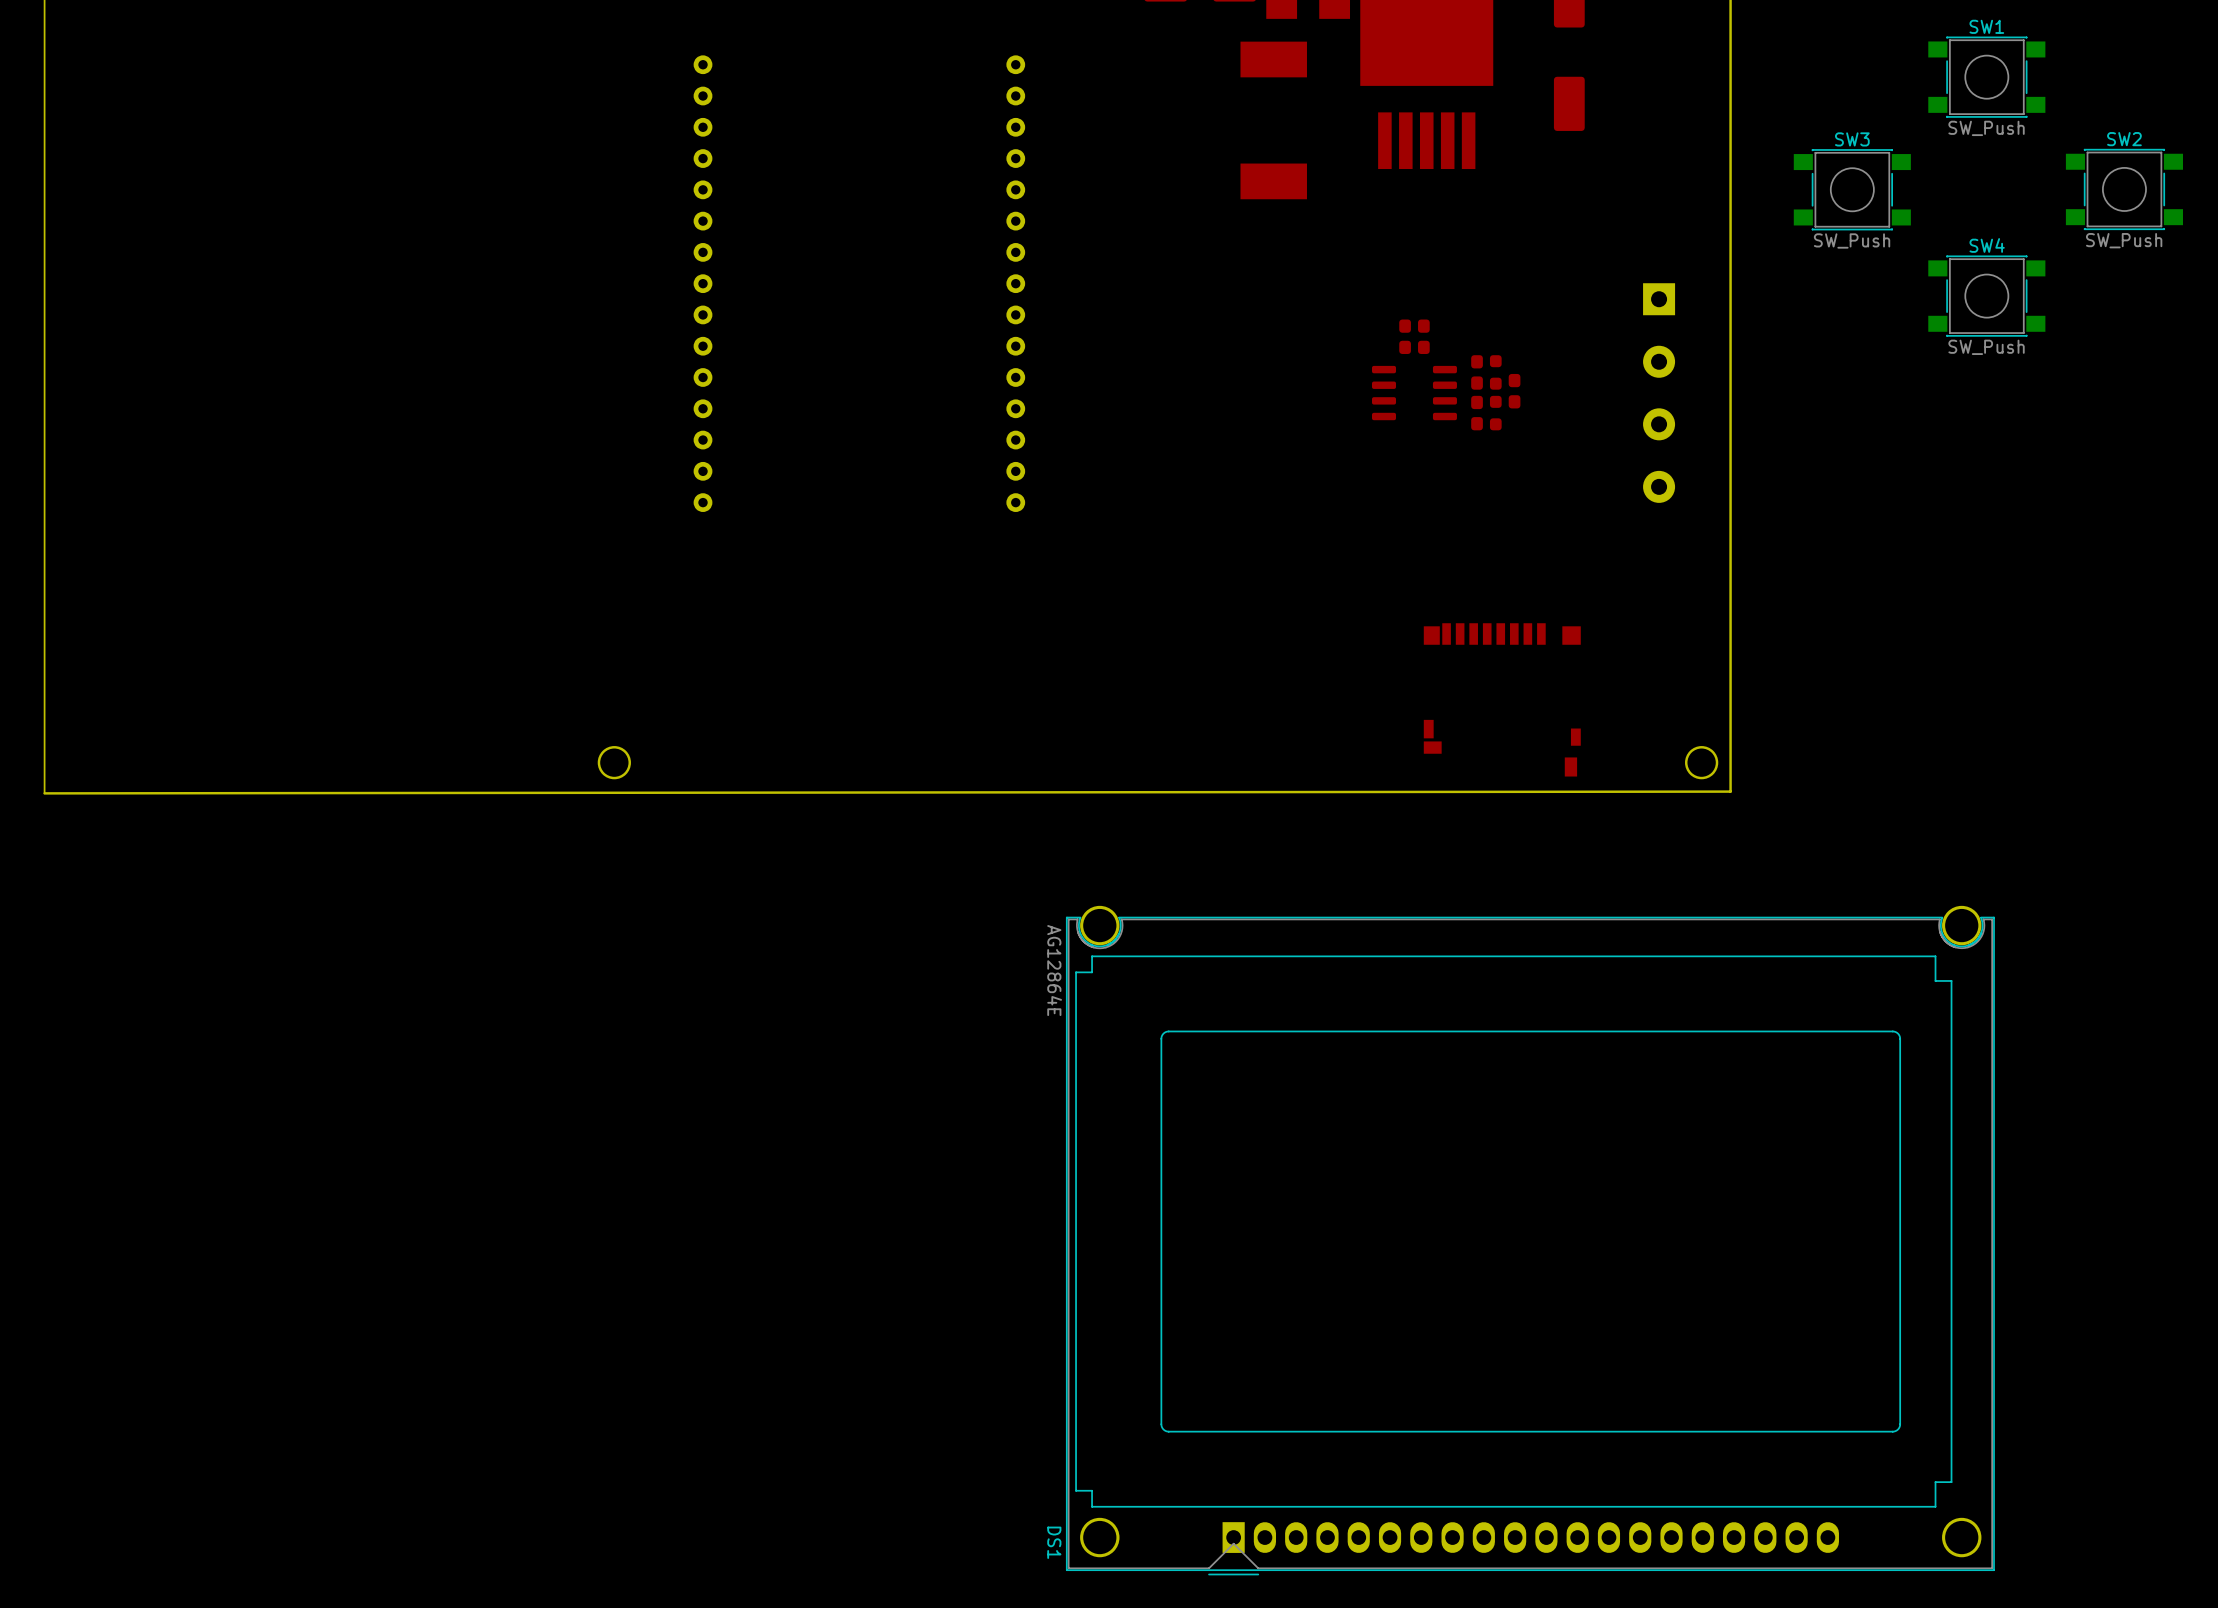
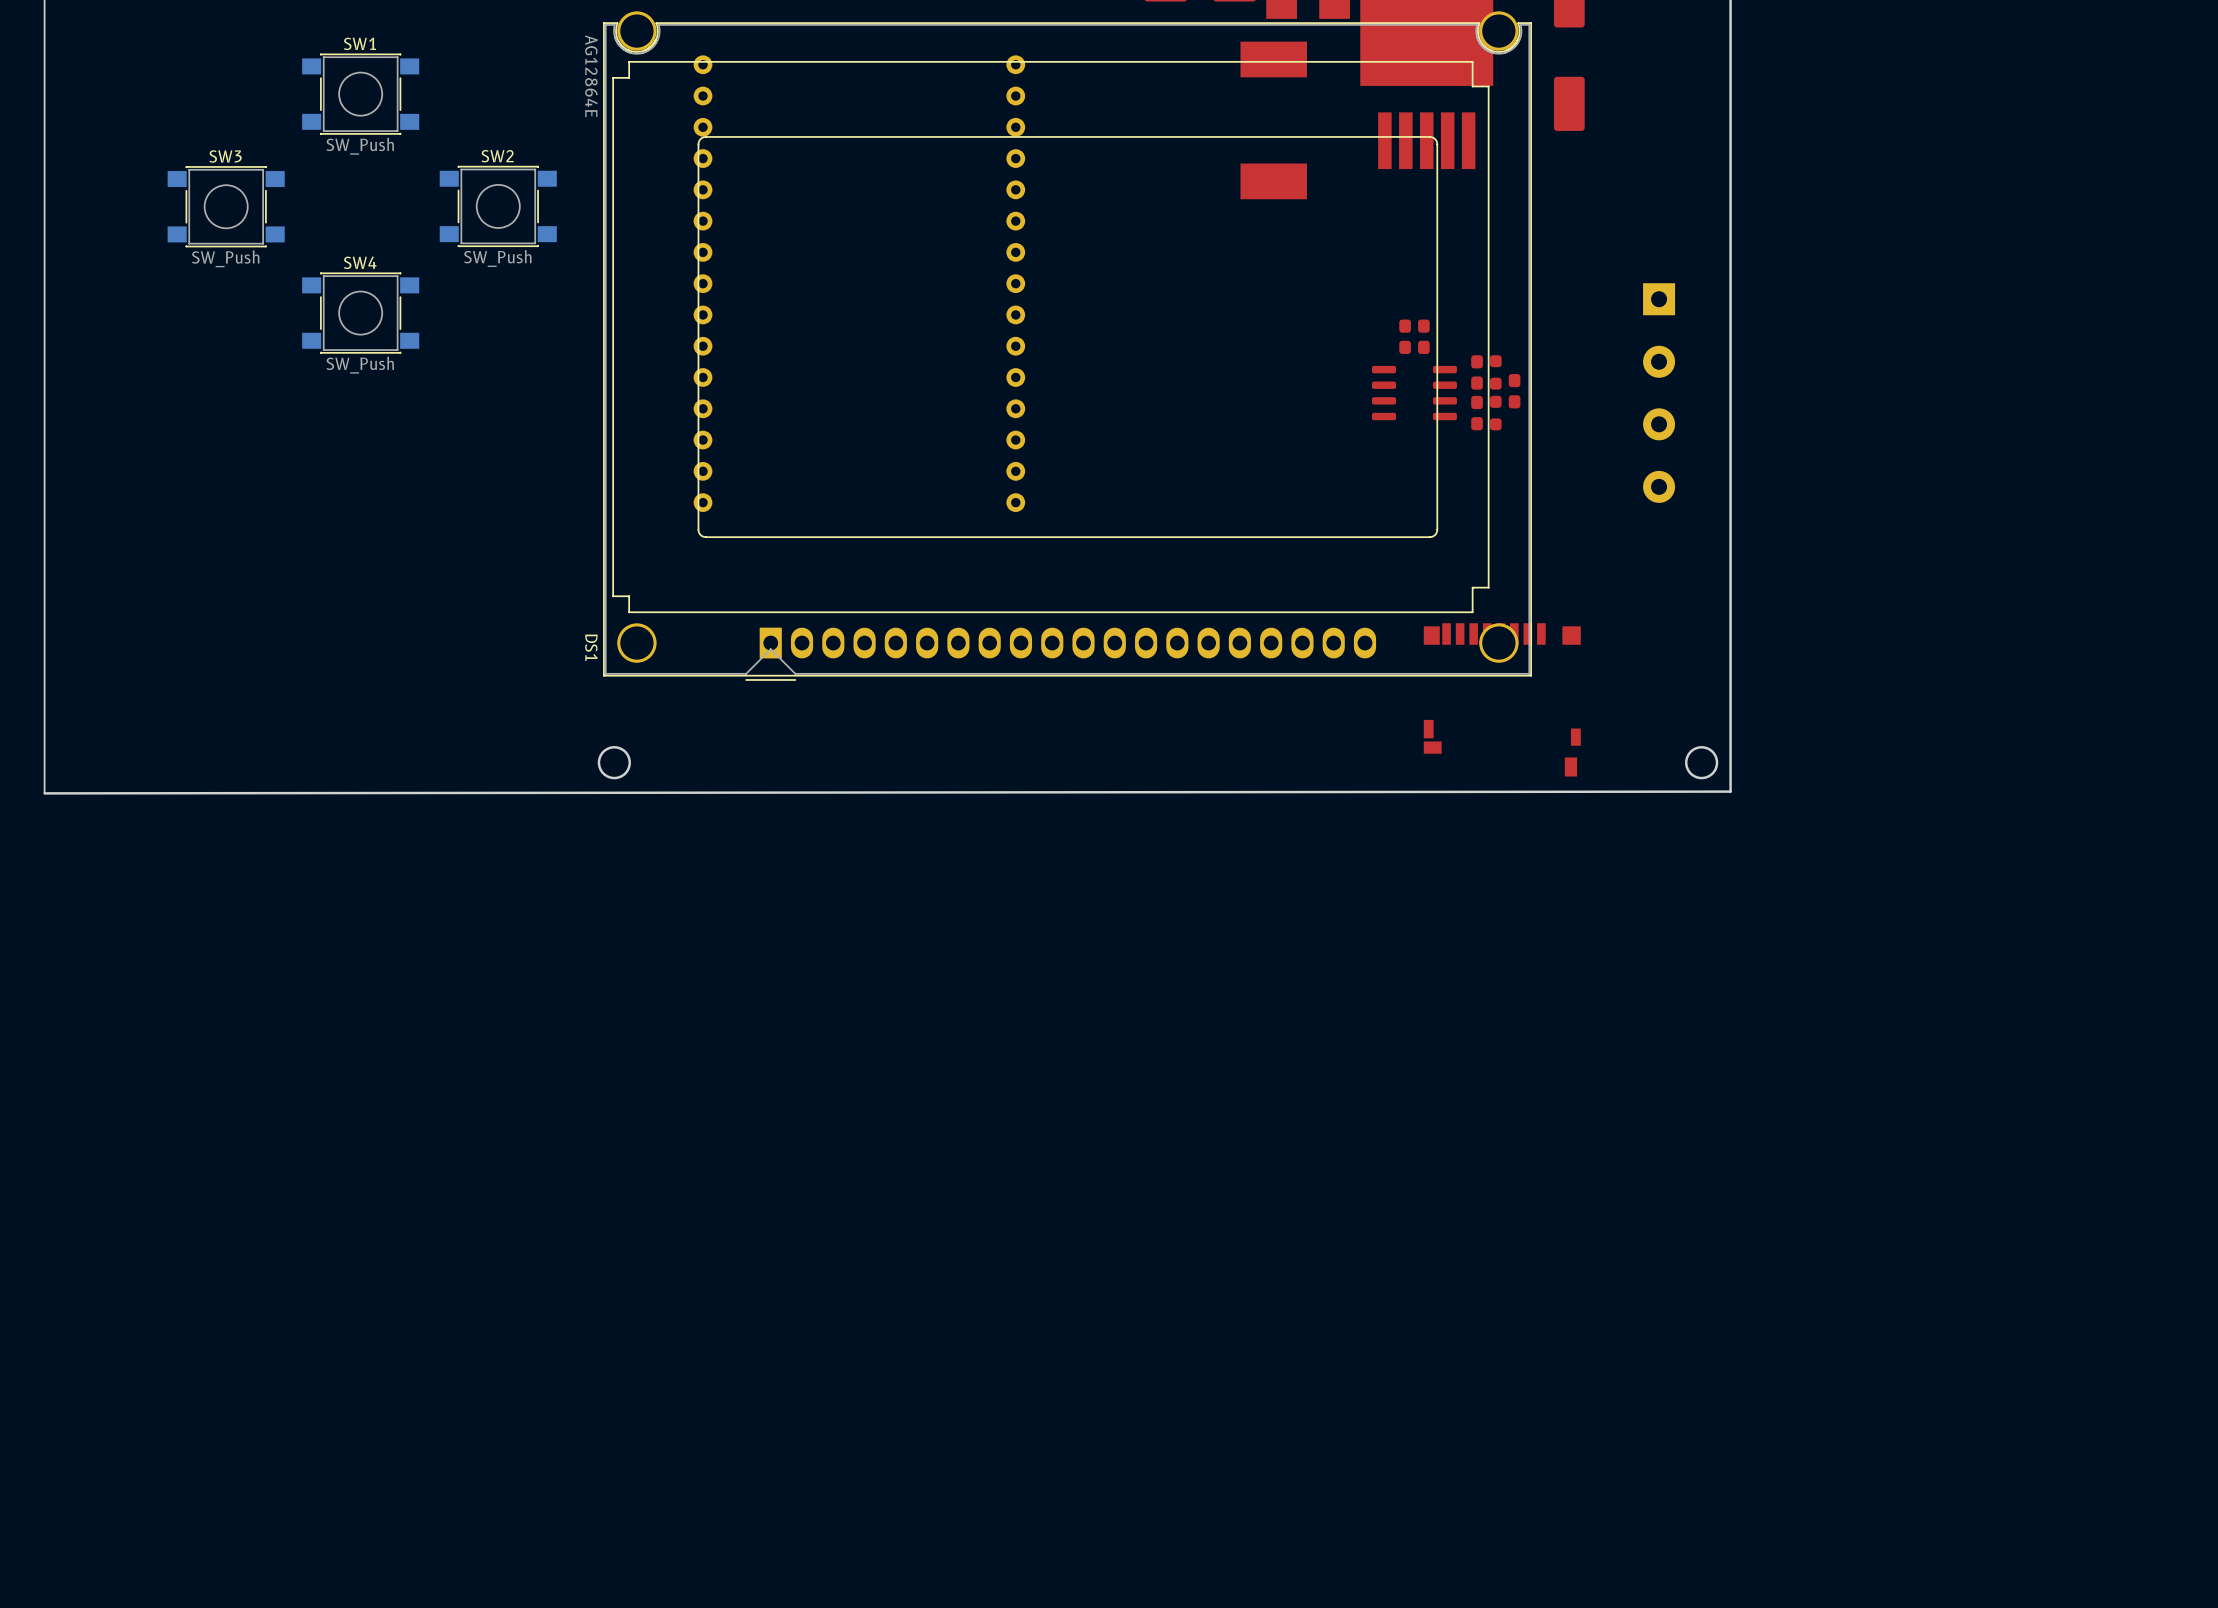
SW1 position: (1986, 77) -> (360, 94)
SW3 position: (1852, 189) -> (226, 206)
SW2 position: (2124, 189) -> (498, 206)
SW4 position: (1986, 296) -> (360, 313)
DS1 position: (1530, 1240) -> (1067, 346)

